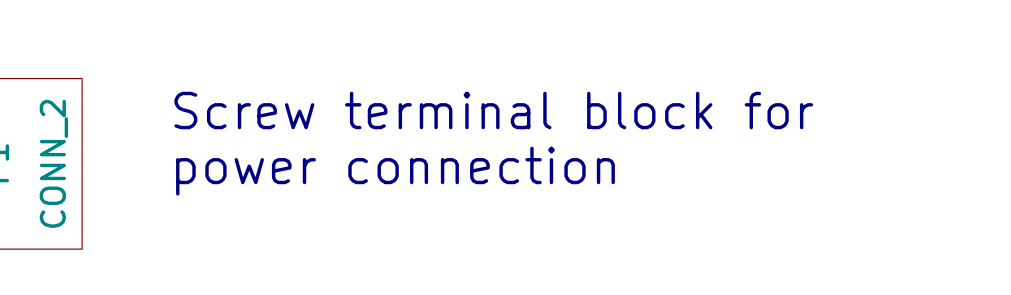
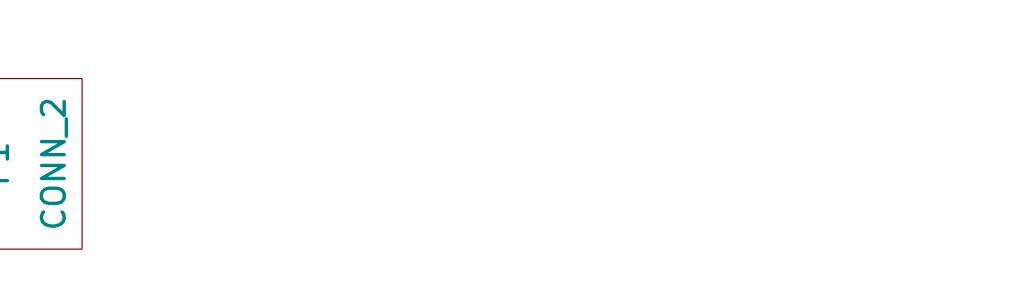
text: Screw terminal block for (493, 110) -> none
text: power connection (395, 171) -> none

